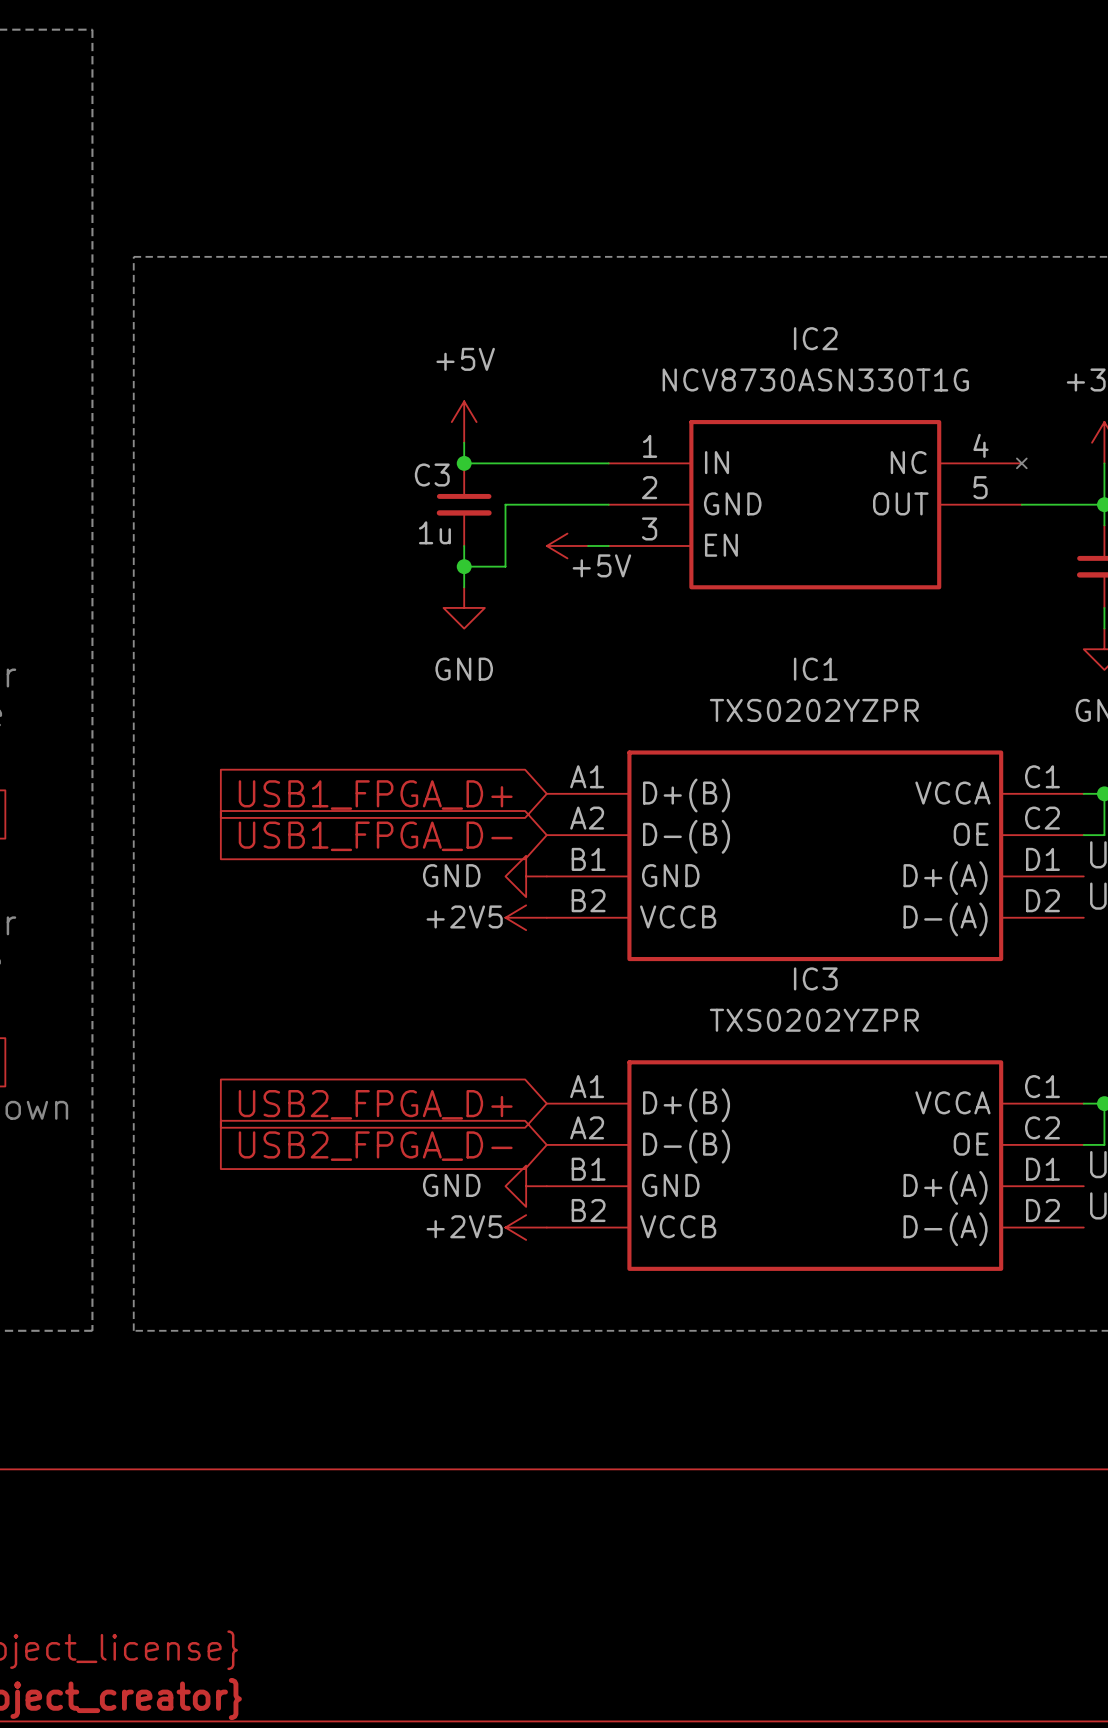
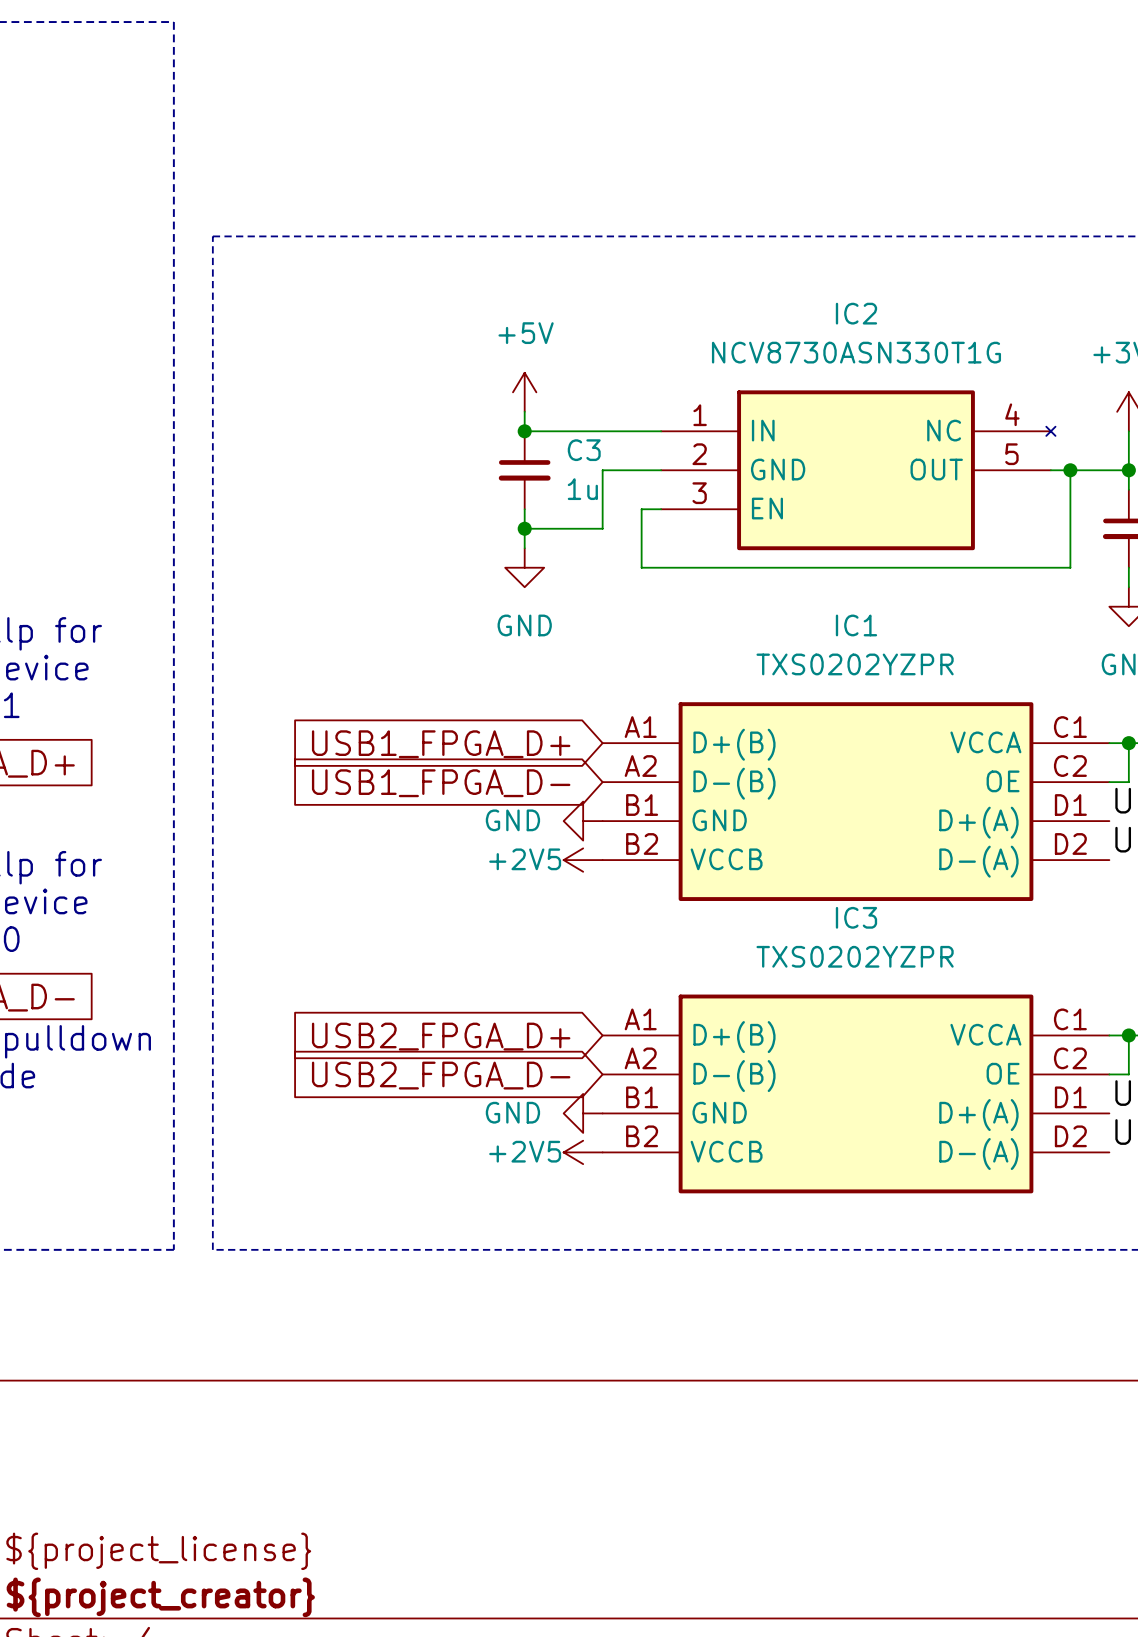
C3 name position: C3 (432, 475) -> C3 (584, 450)
wire: (546, 504) (505, 504) (505, 566) -> (602, 470) (602, 528) (563, 528)
wire: none -> (1070, 470) (1070, 567) (641, 567) (641, 509)
junction: none -> (1070, 470)
C3 value position: 1u (434, 532) -> 1u (582, 489)
power symbol: +5V (567, 545) -> none

